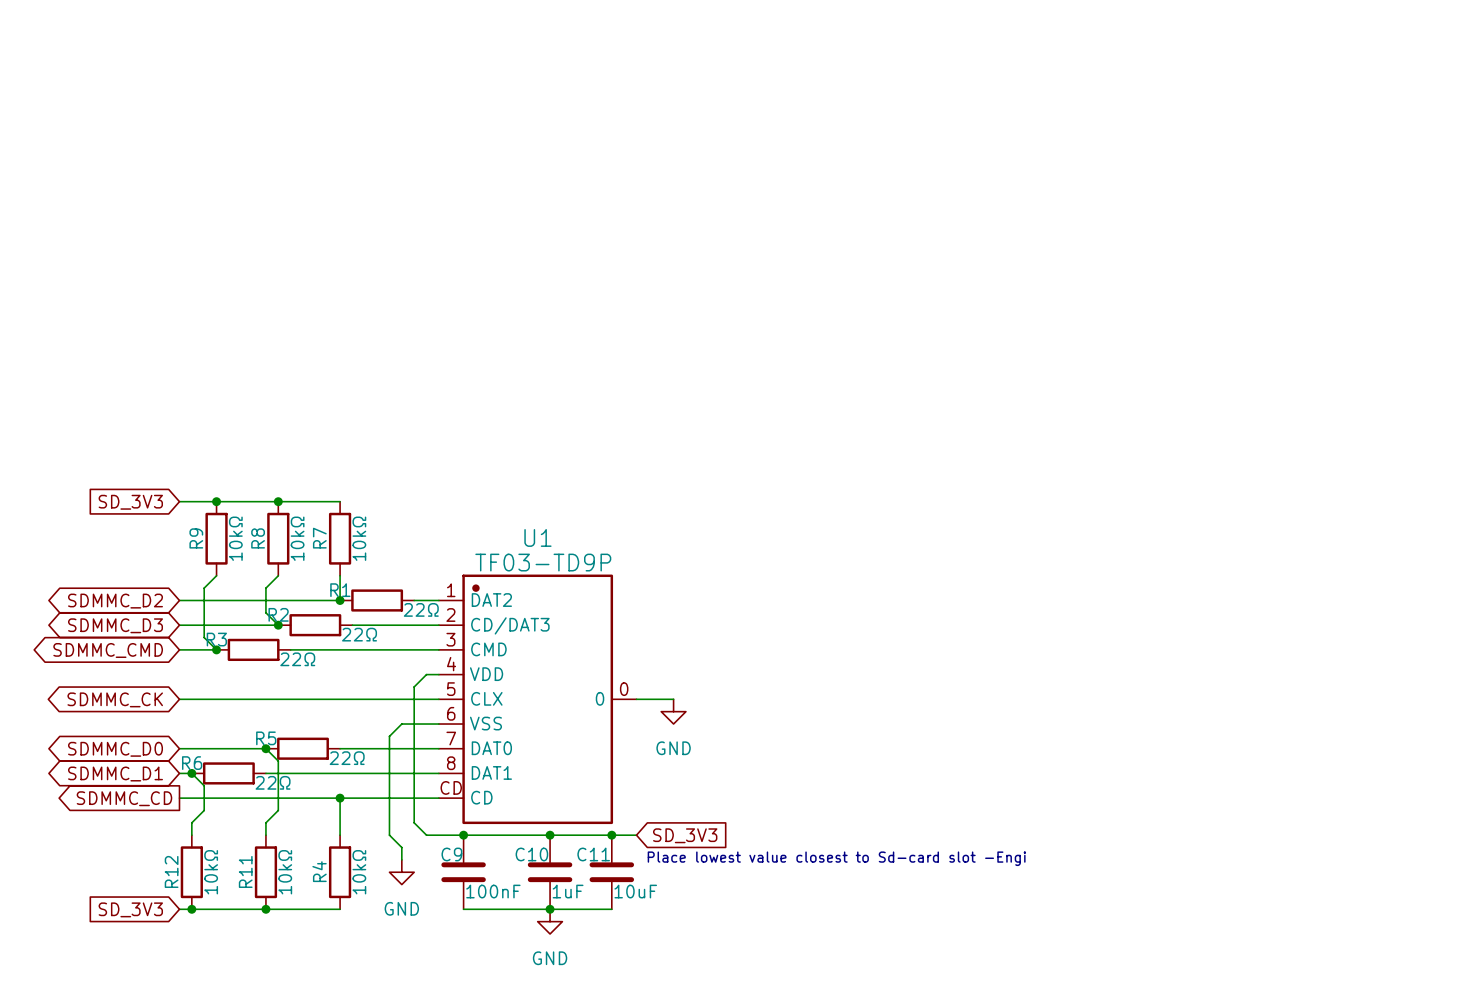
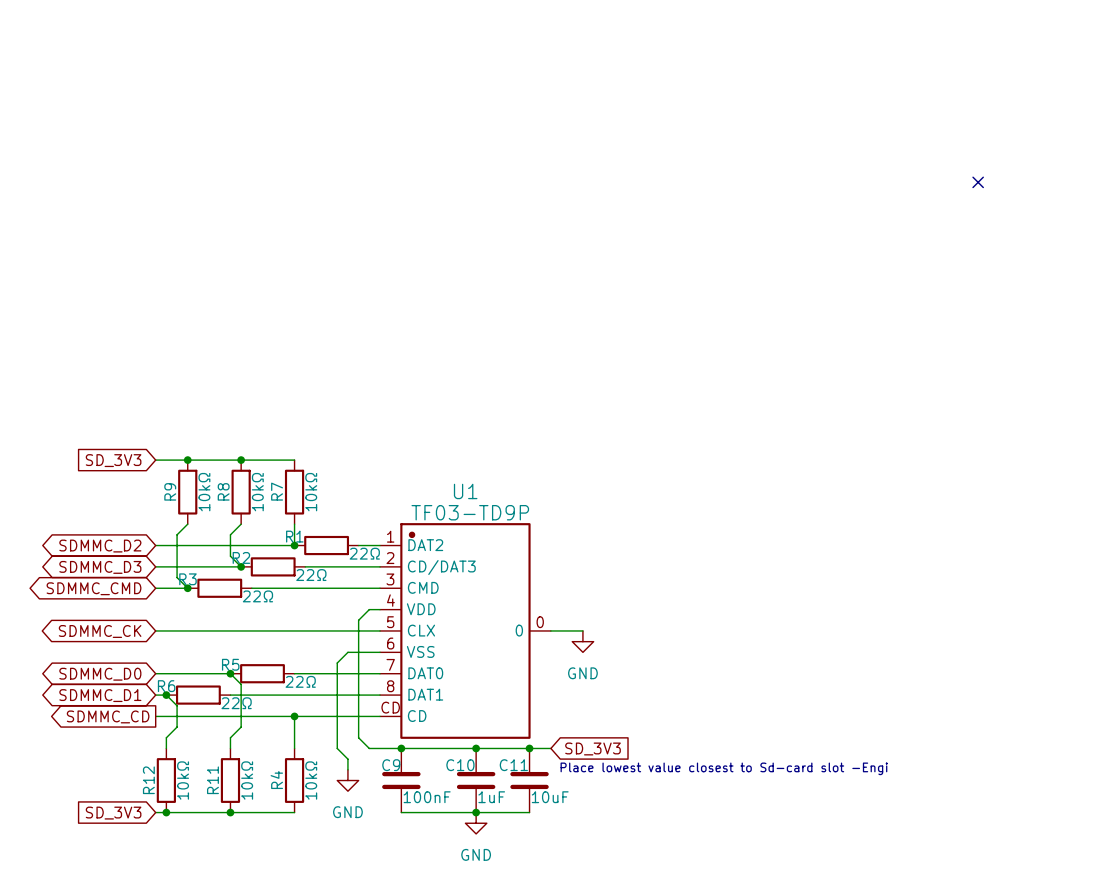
no-connect mark: none -> (978, 182)

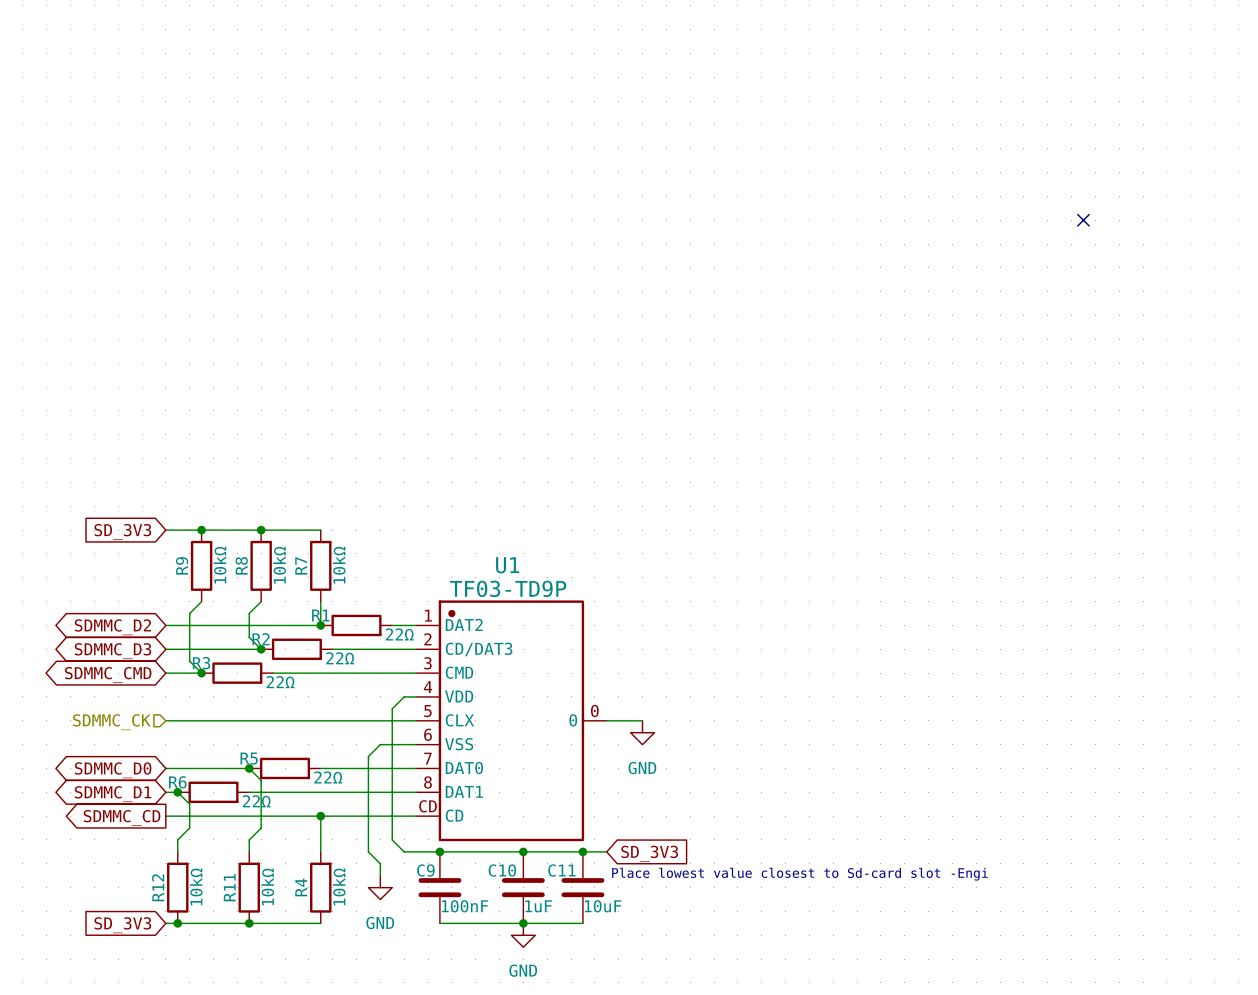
hierarchical label: none -> SDMMC_CK (111, 722)
global label: SDMMC_CK (100, 631) -> none

